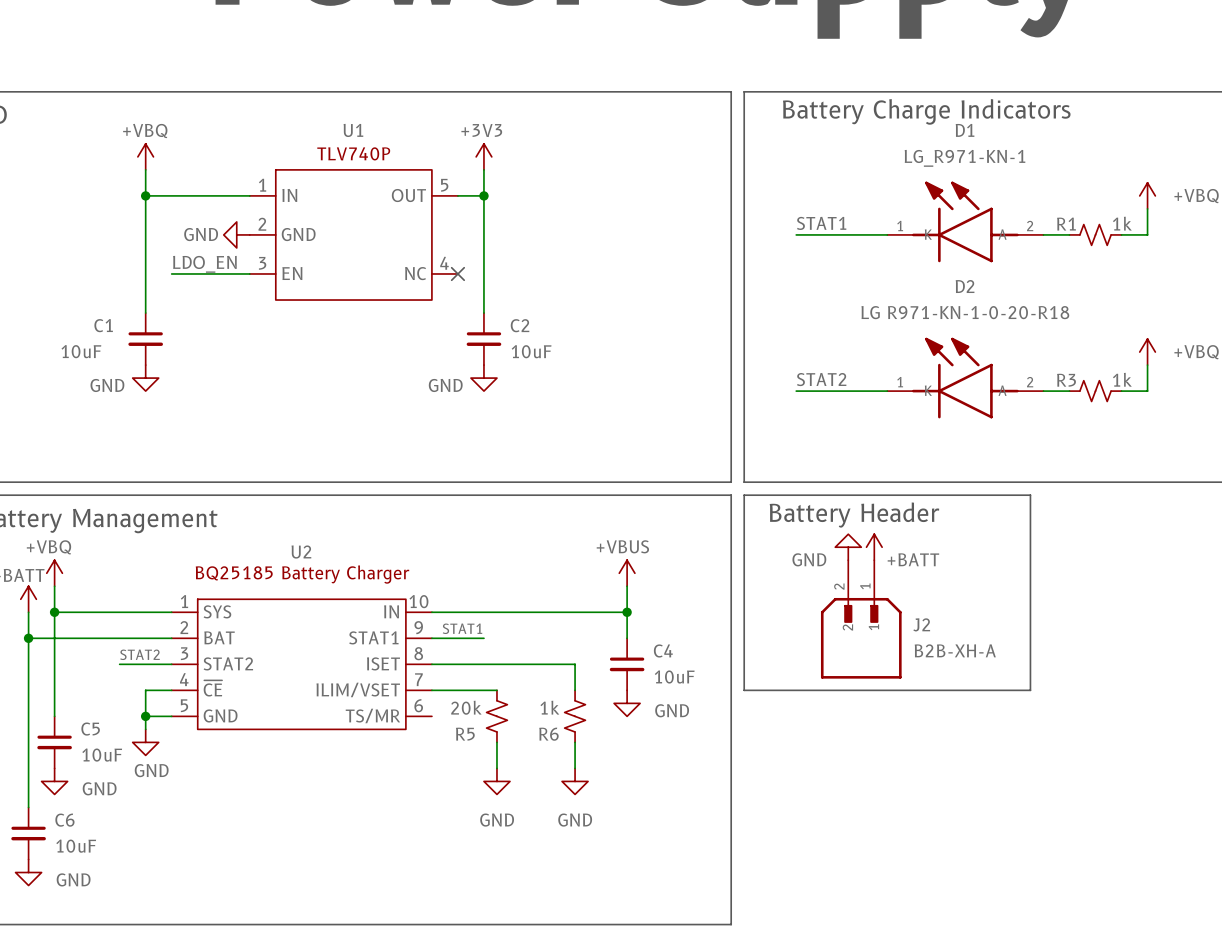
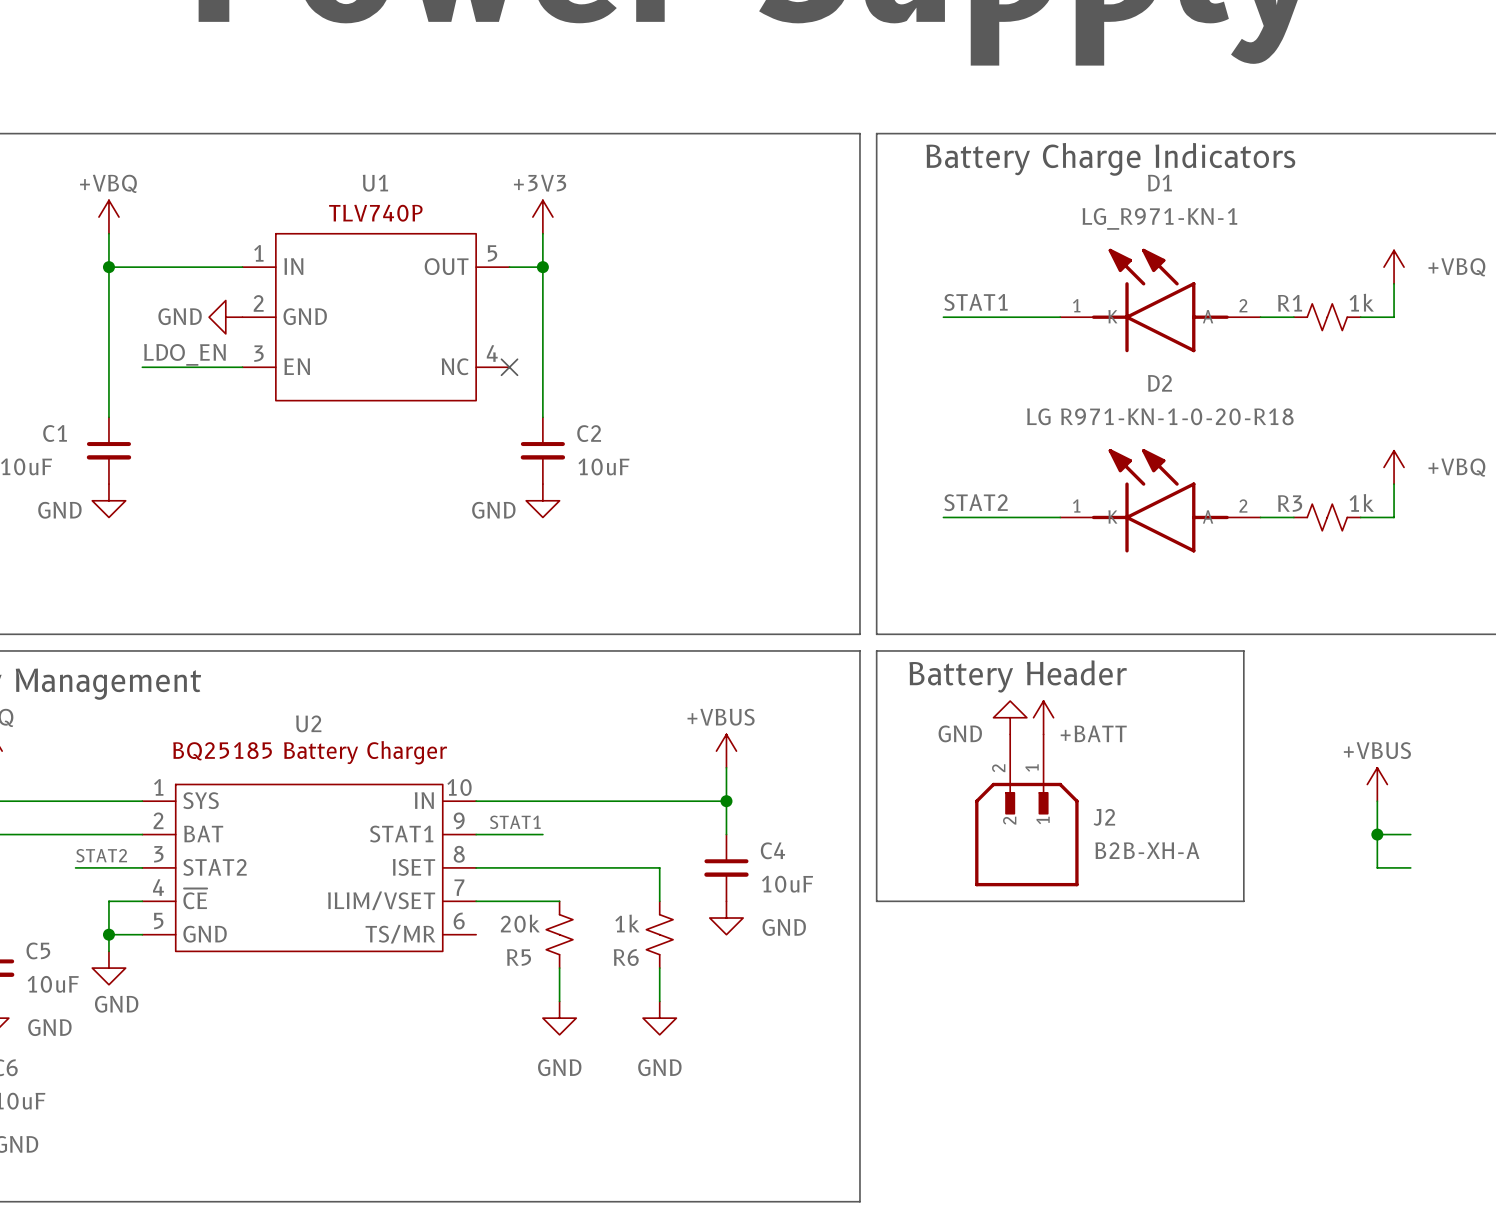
power symbol: none -> +VBUS (1377, 784)
wire: none -> (1377, 801) (1377, 867) (1410, 867)
wire: none -> (1377, 834) (1410, 834)
junction: none -> (1377, 834)

